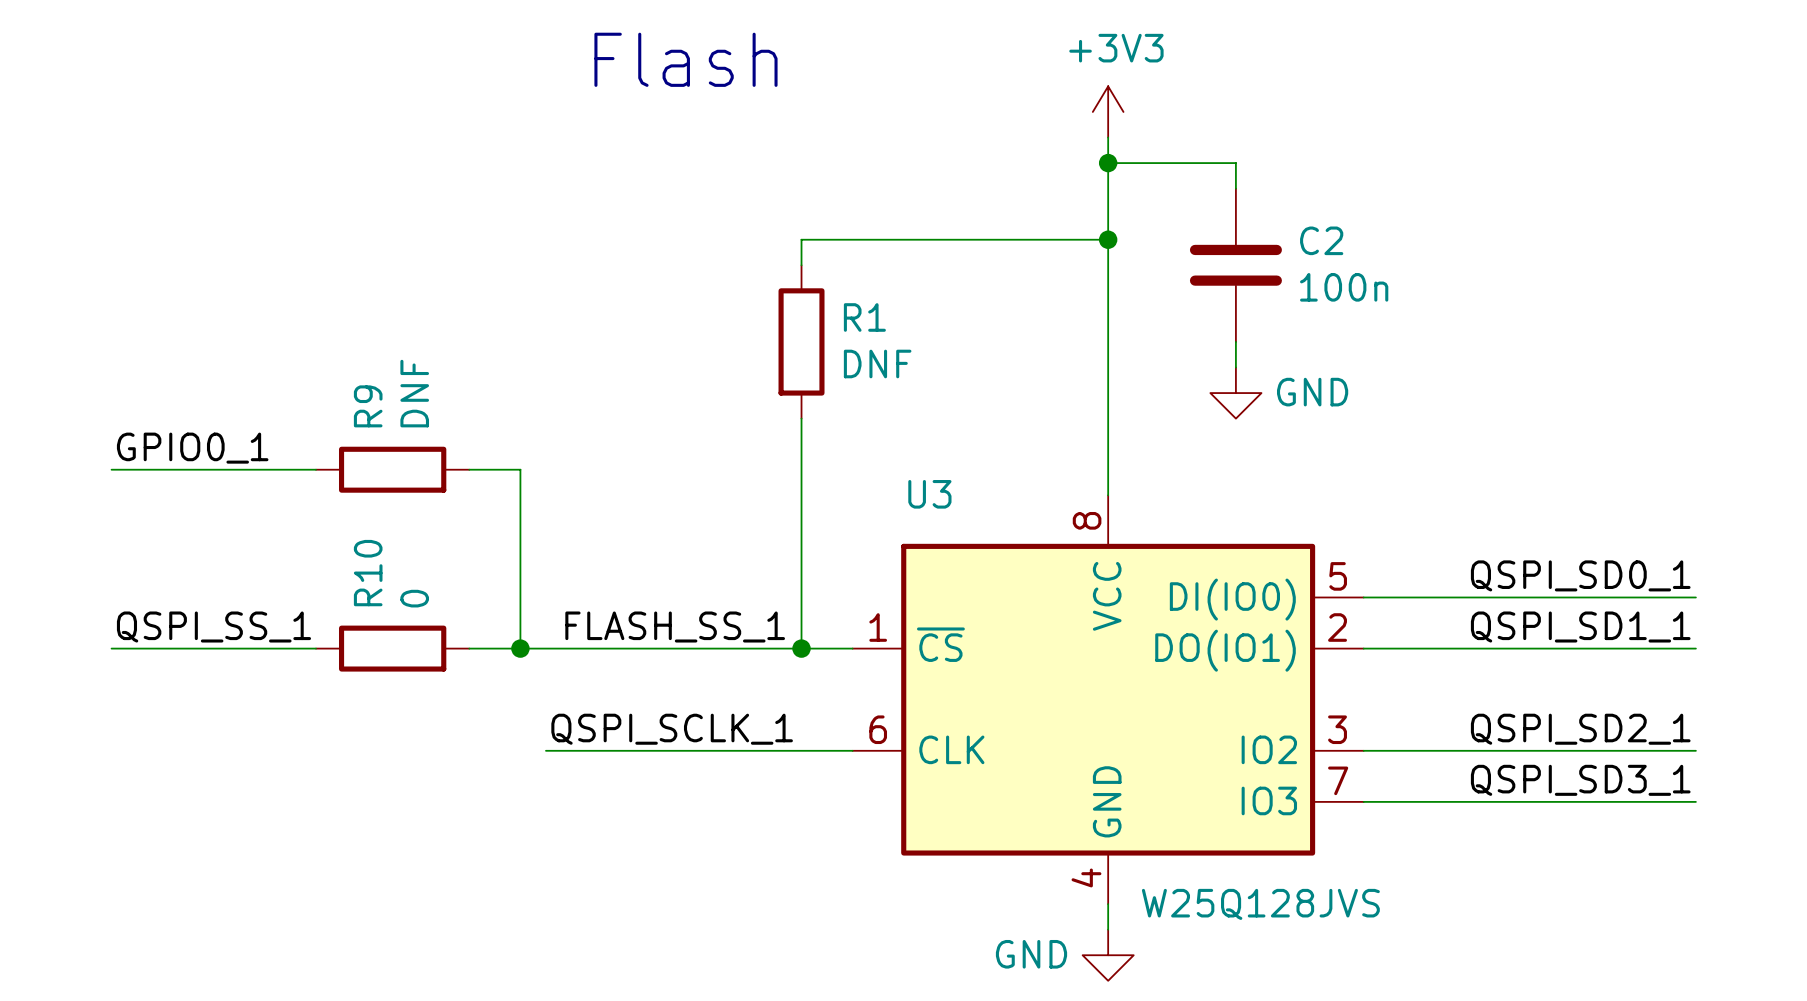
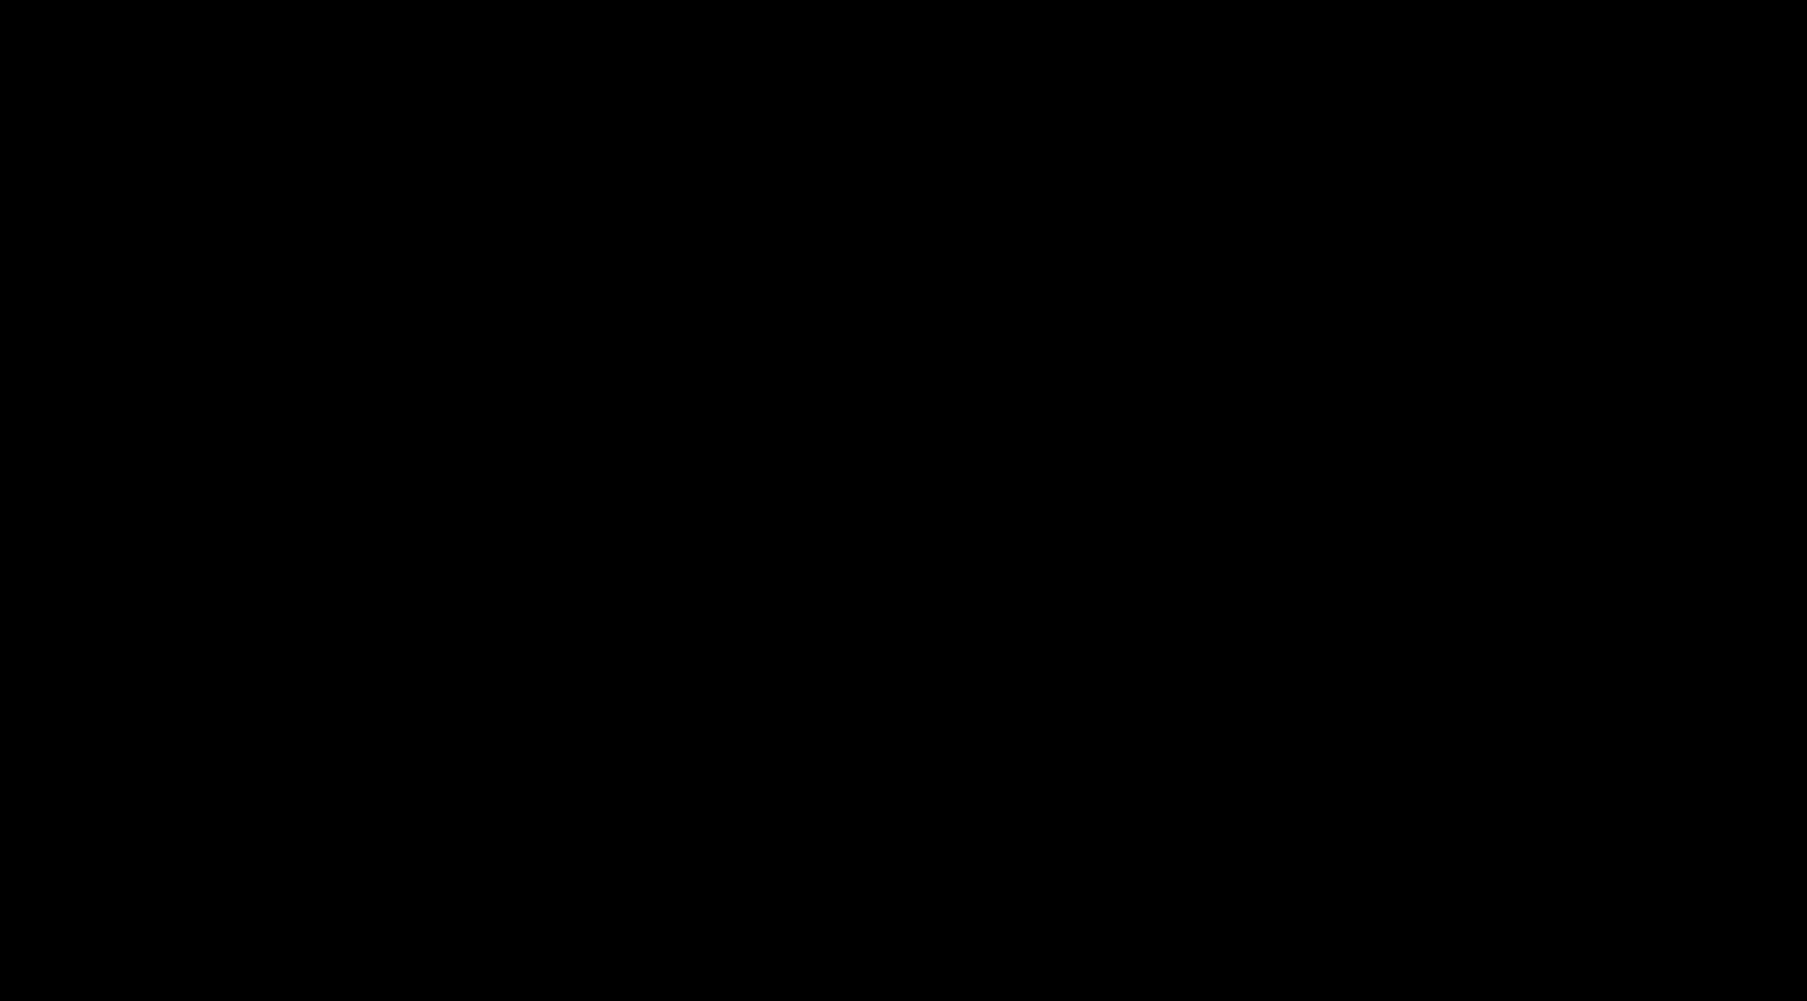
text: Flash (685, 59) -> none
power symbol: +3V3 (1108, 111) -> none
wire: (1108, 137) (1108, 495) -> none
wire: (1108, 163) (1235, 163) (1235, 188) -> none
junction: (1108, 163) -> none
wire: (1108, 239) (801, 239) (801, 265) -> none
junction: (1108, 239) -> none
C2: 100n (1235, 265) -> none
R1: DNF (801, 341) -> none
wire: (1235, 341) (1235, 367) -> none
power symbol: GND (1235, 393) -> none
wire: (801, 418) (801, 648) -> none
label: GPIO0_1 (192, 448) -> none
wire: (111, 469) (315, 469) -> none
R9: DNF (392, 469) -> none
wire: (469, 469) (520, 469) (520, 648) -> none
label: QSPI_SD0_1 (1580, 575) -> none
wire: (1363, 597) (1695, 597) -> none
label: QSPI_SS_1 (213, 627) -> none
label: FLASH_SS_1 (675, 627) -> none
label: QSPI_SD1_1 (1580, 627) -> none
wire: (111, 648) (315, 648) -> none
R10: 0 (392, 648) -> none
wire: (469, 648) (852, 648) -> none
junction: (520, 648) -> none
junction: (801, 648) -> none
wire: (1363, 648) (1695, 648) -> none
U3: W25Q128JVS (1108, 699) -> none
label: QSPI_SCLK_1 (672, 729) -> none
label: QSPI_SD2_1 (1580, 729) -> none
wire: (545, 750) (852, 750) -> none
wire: (1363, 750) (1695, 750) -> none
label: QSPI_SD3_1 (1580, 780) -> none
wire: (1363, 801) (1695, 801) -> none
wire: (1108, 904) (1108, 929) -> none
power symbol: GND (1108, 955) -> none

